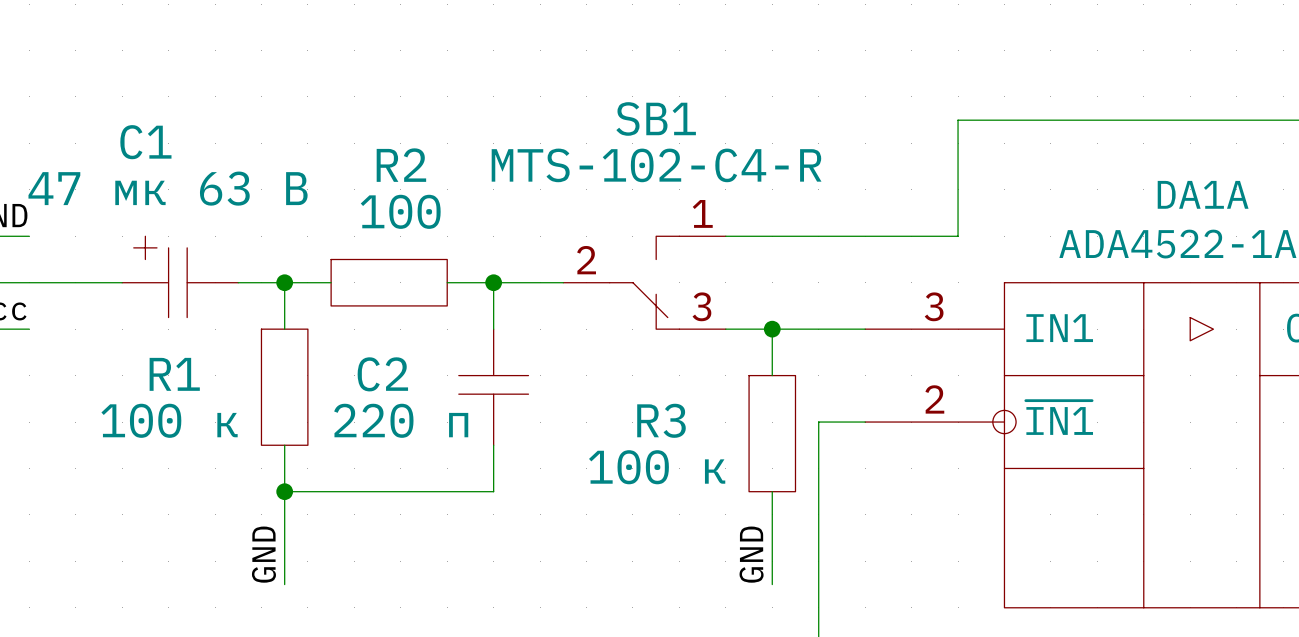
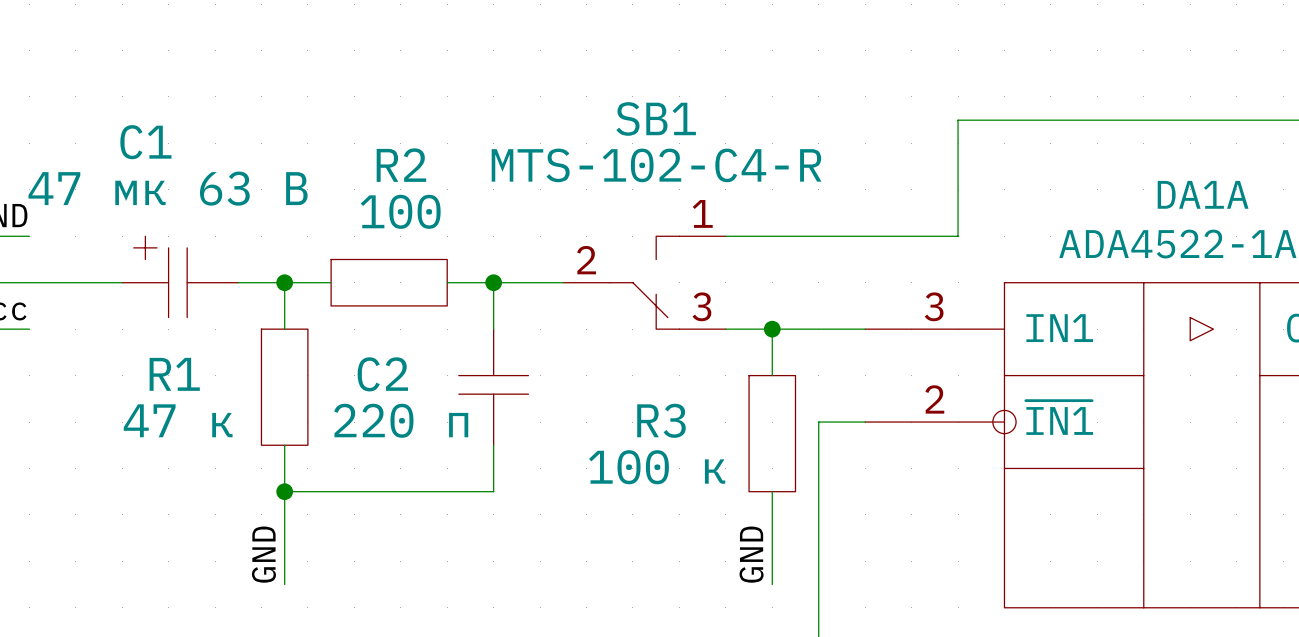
R1 value: 100 к (169, 420) -> 47 к (178, 420)

